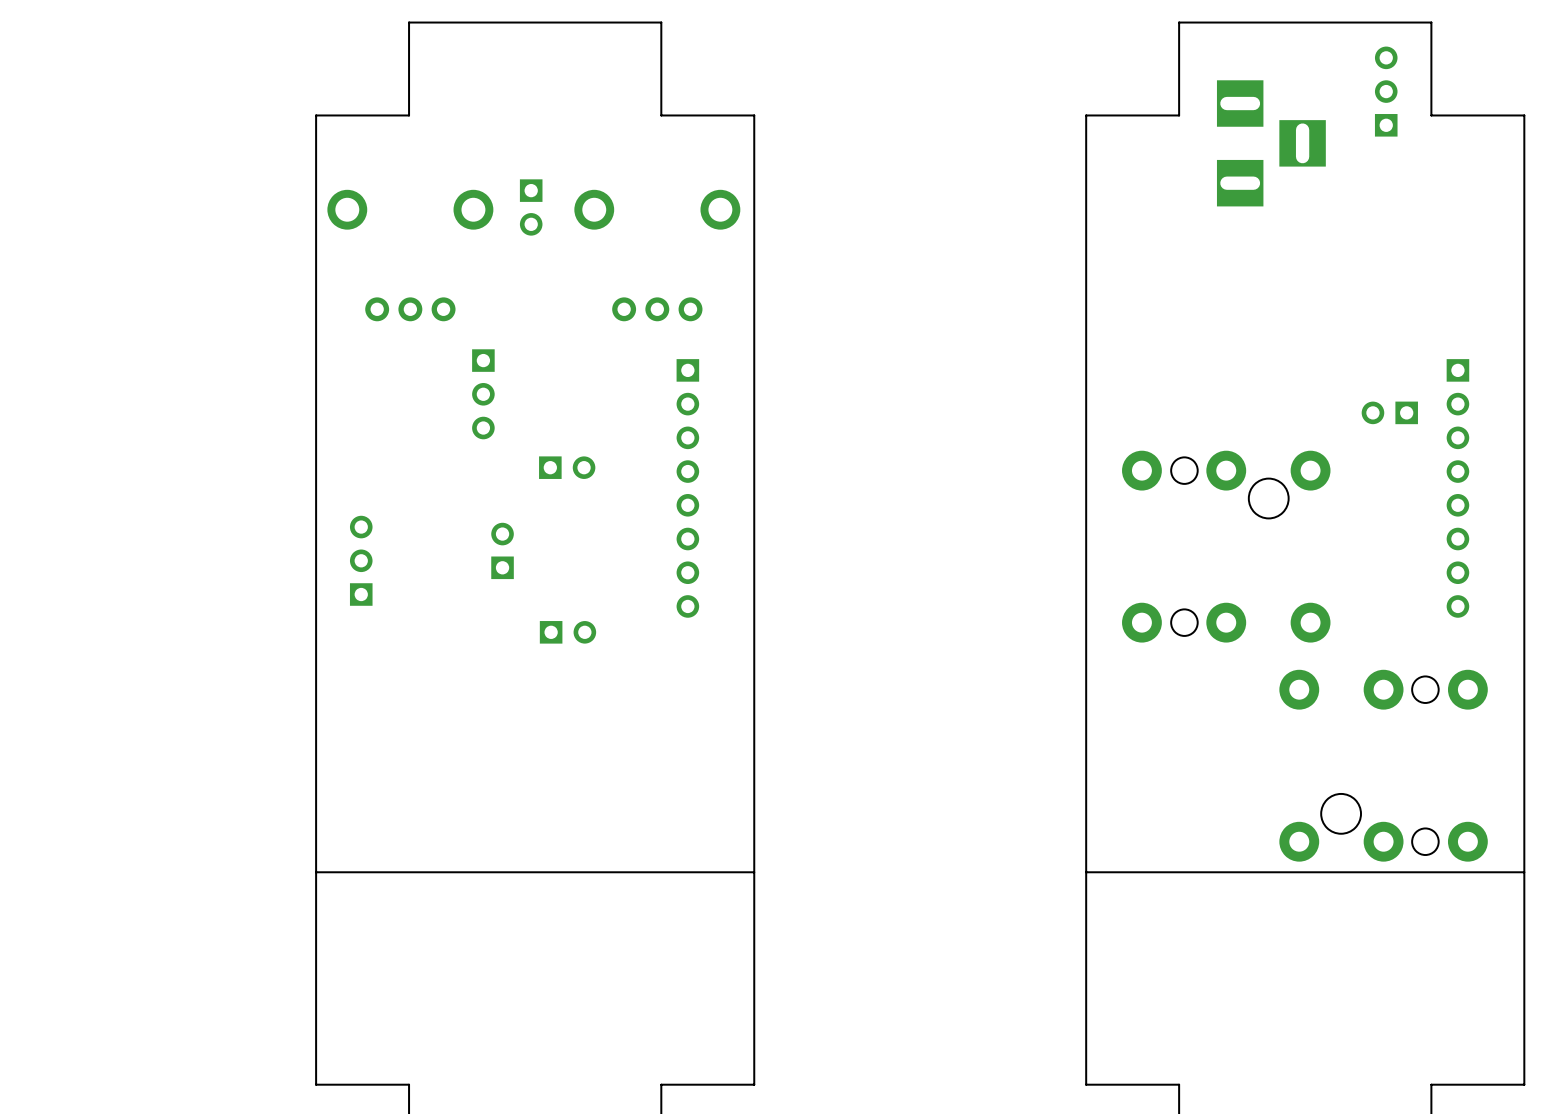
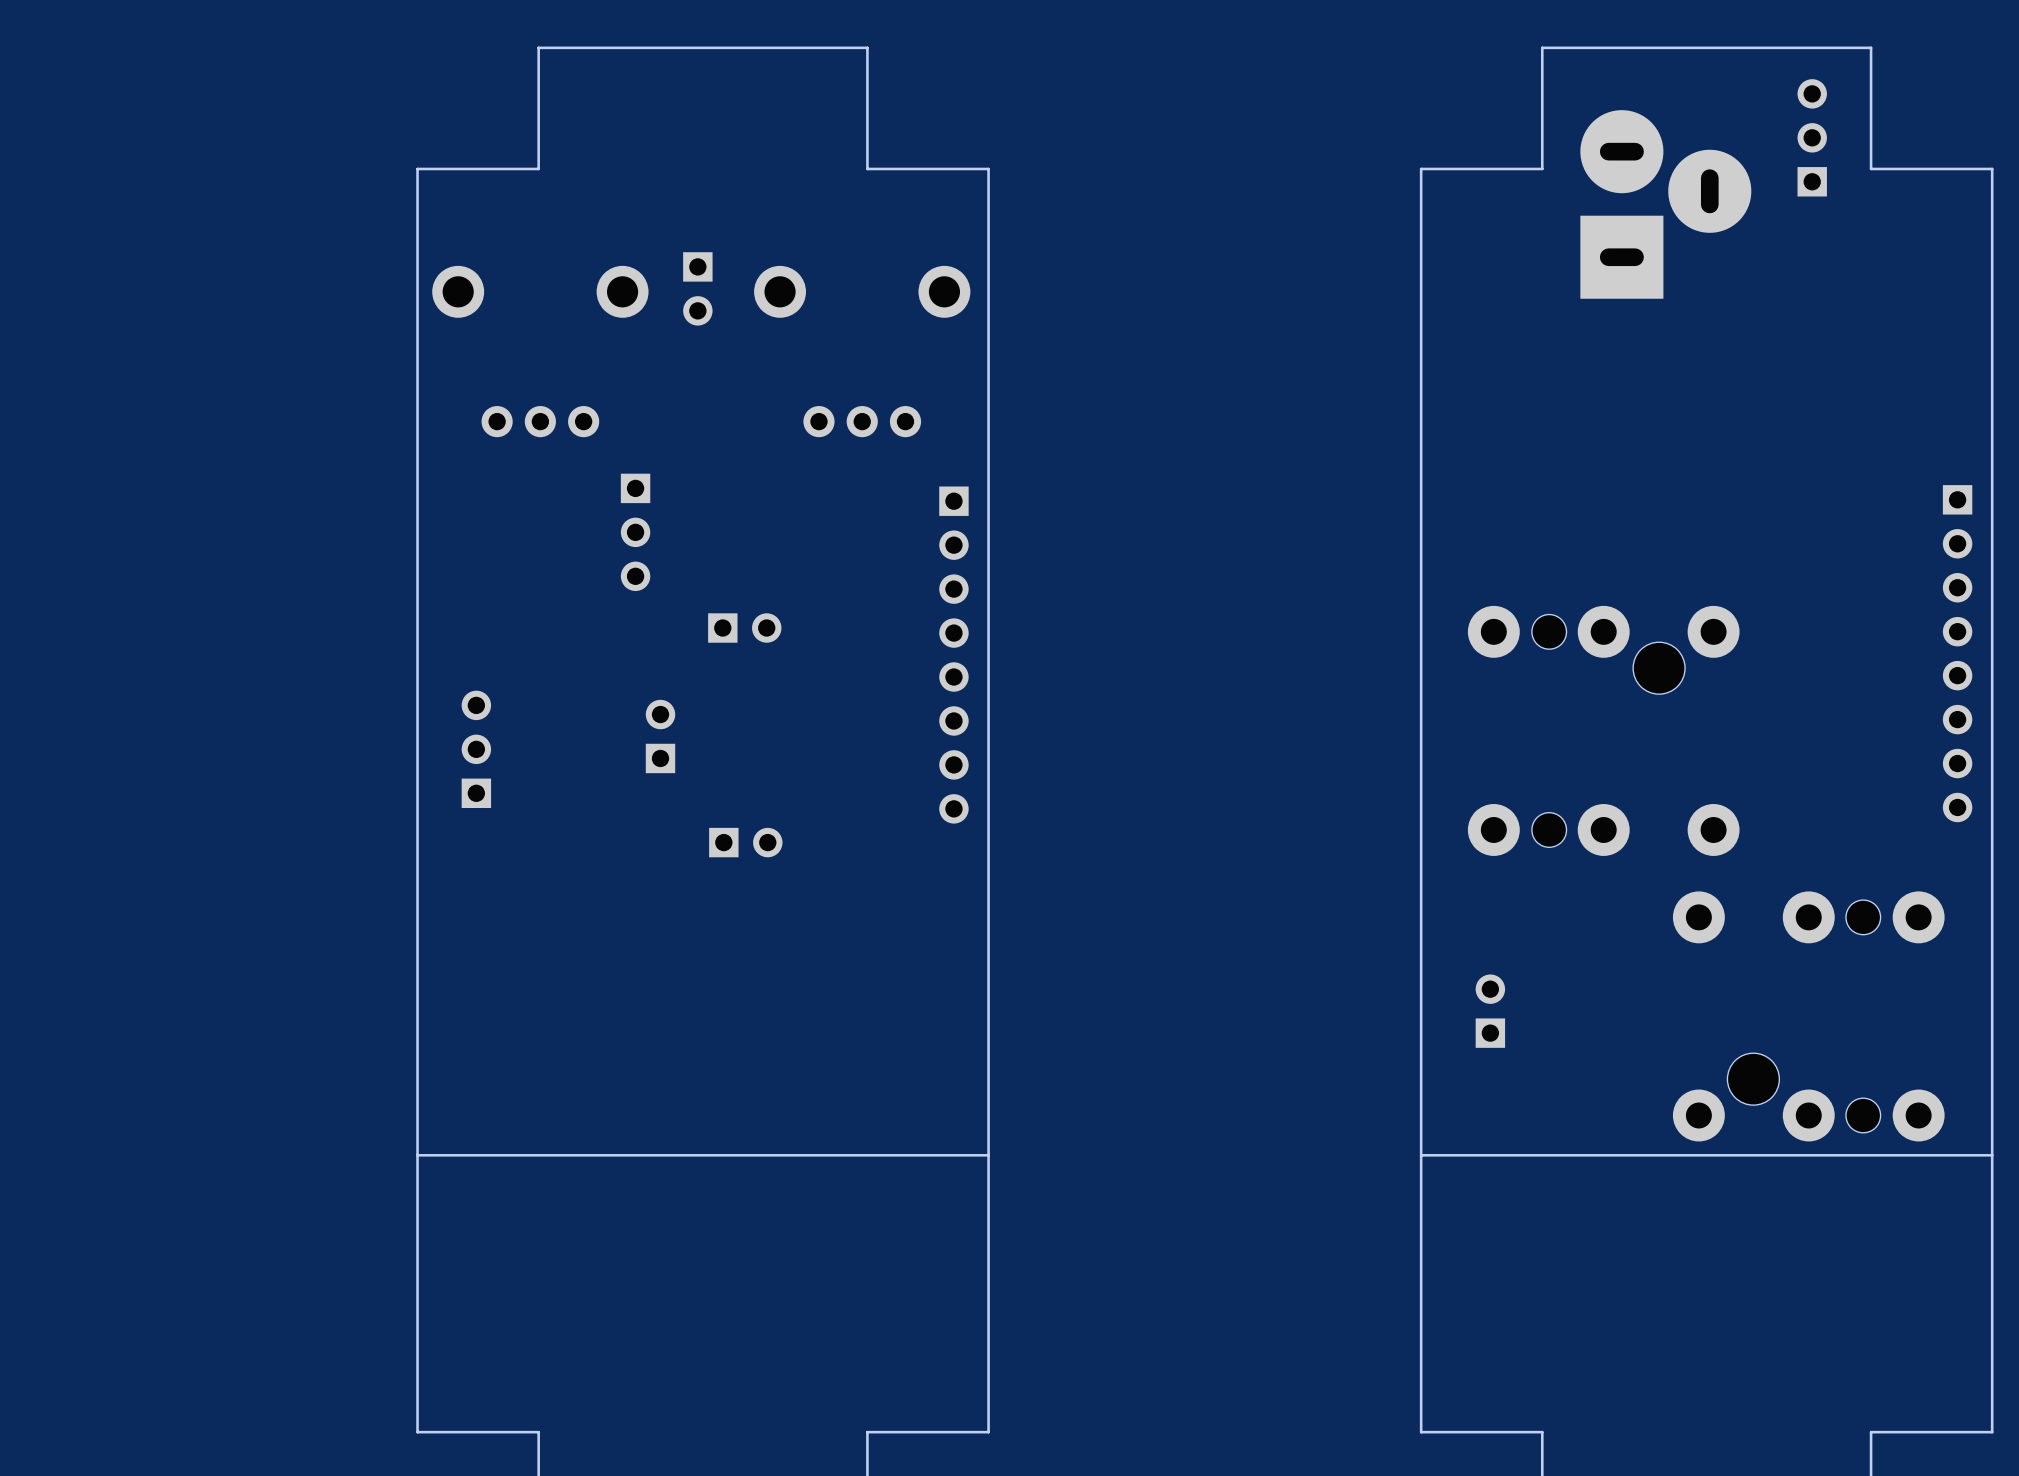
part footprint: [1216, 80, 1326, 207] -> [1580, 110, 1752, 299]
part: (1389, 412) -> none
part position: (687, 488) -> (953, 655)
part position: (1457, 488) -> (1957, 653)
part: none -> (1490, 1011)

